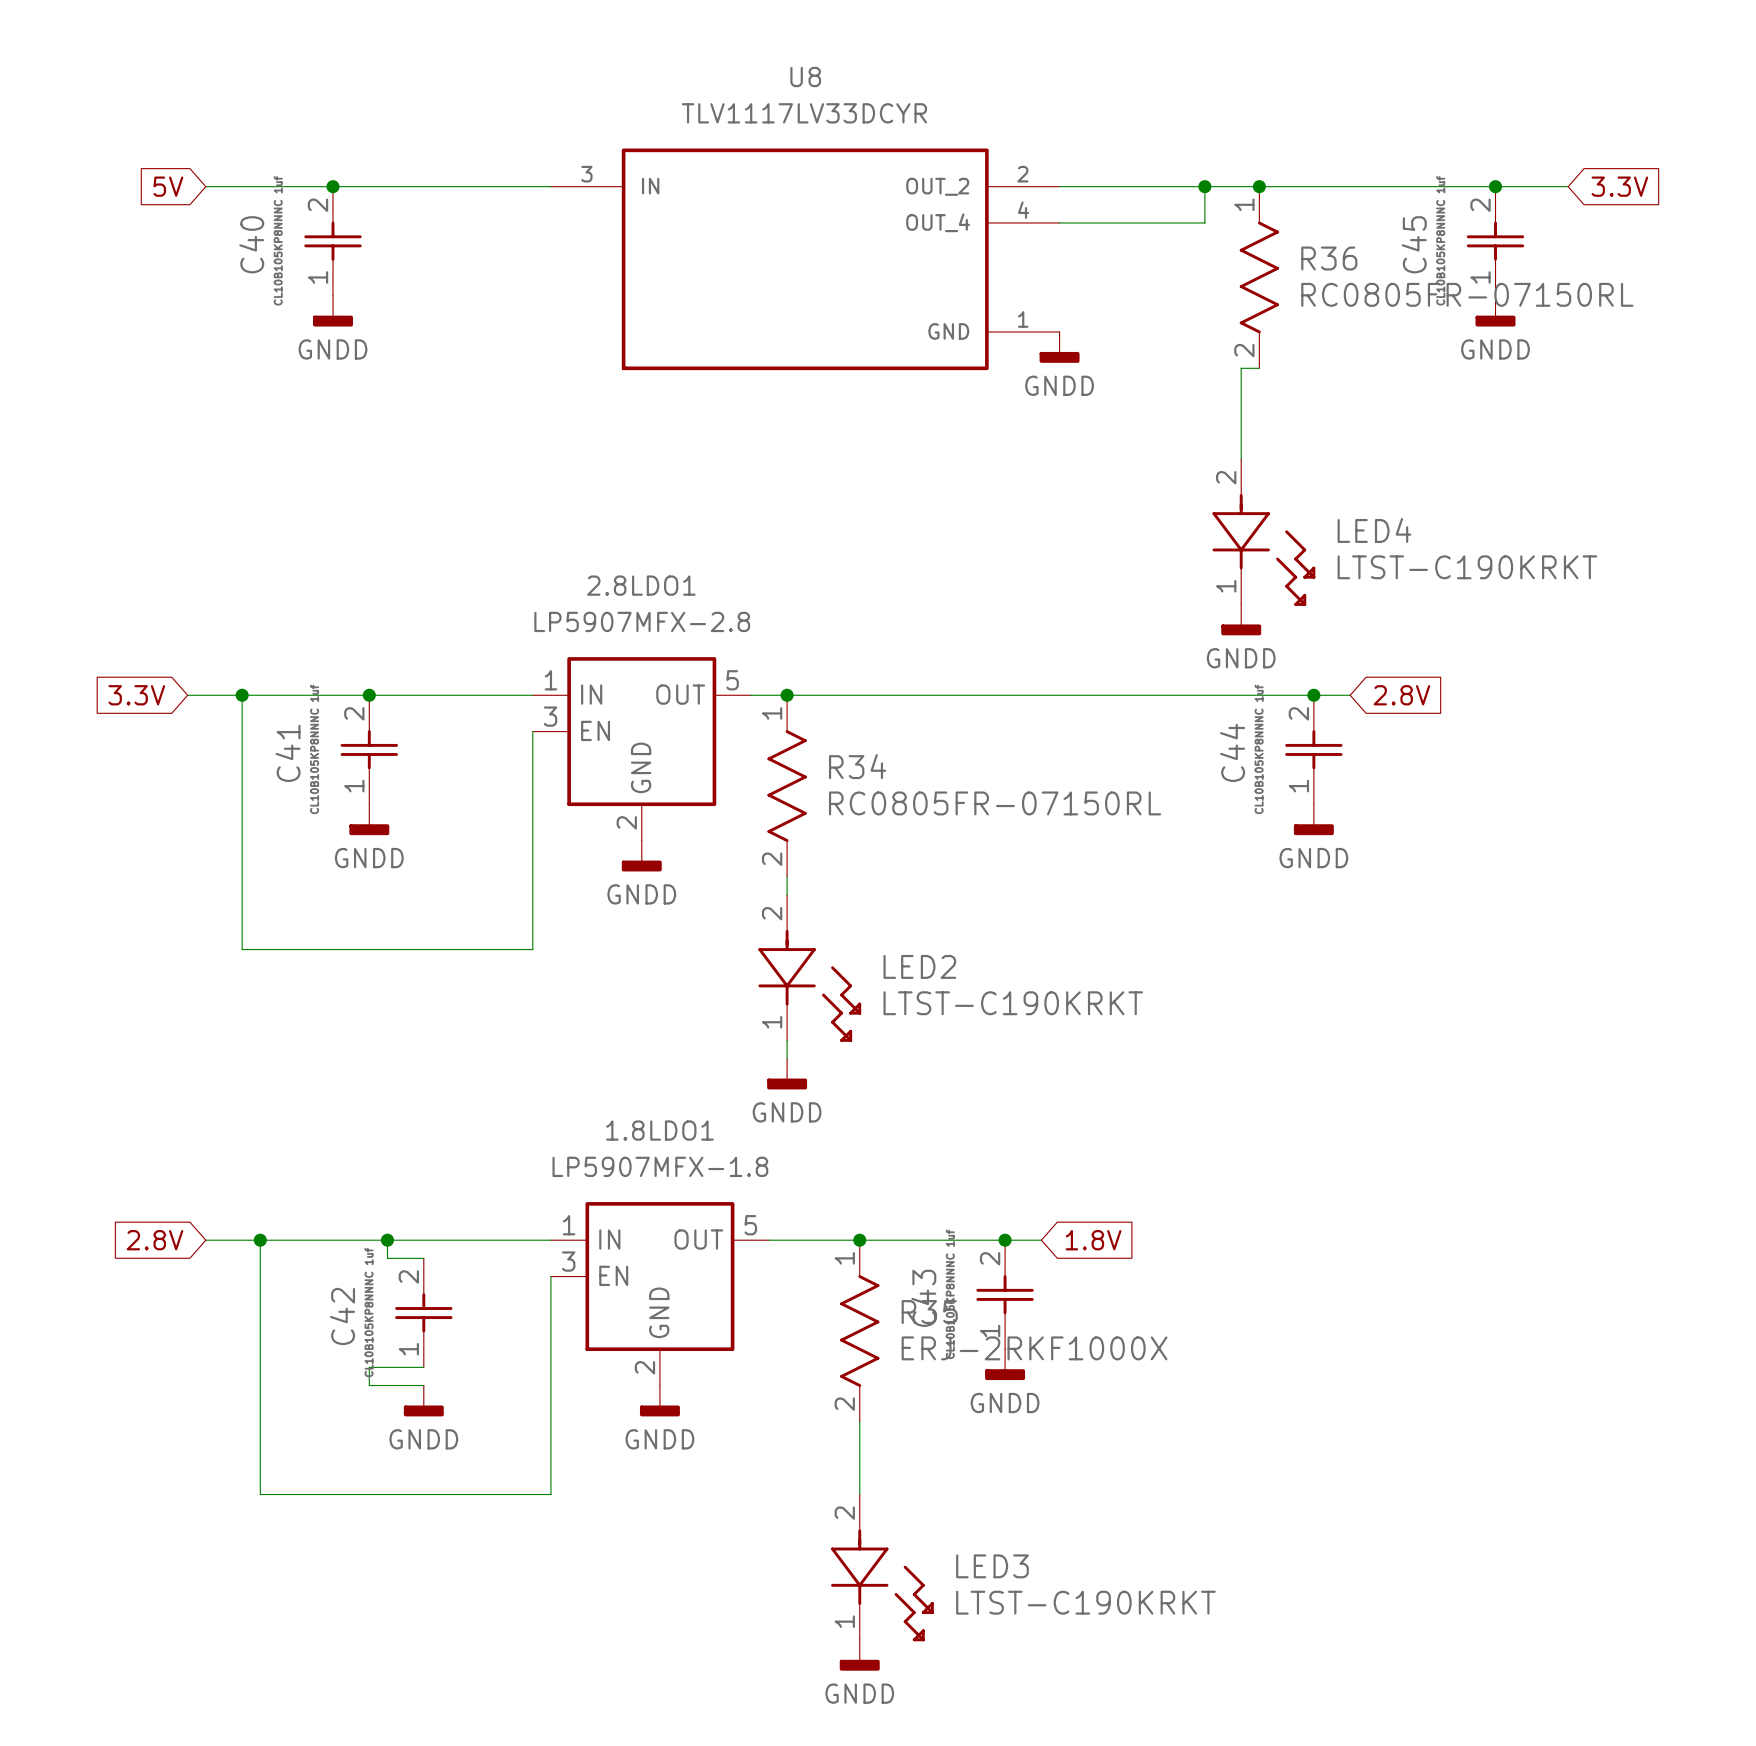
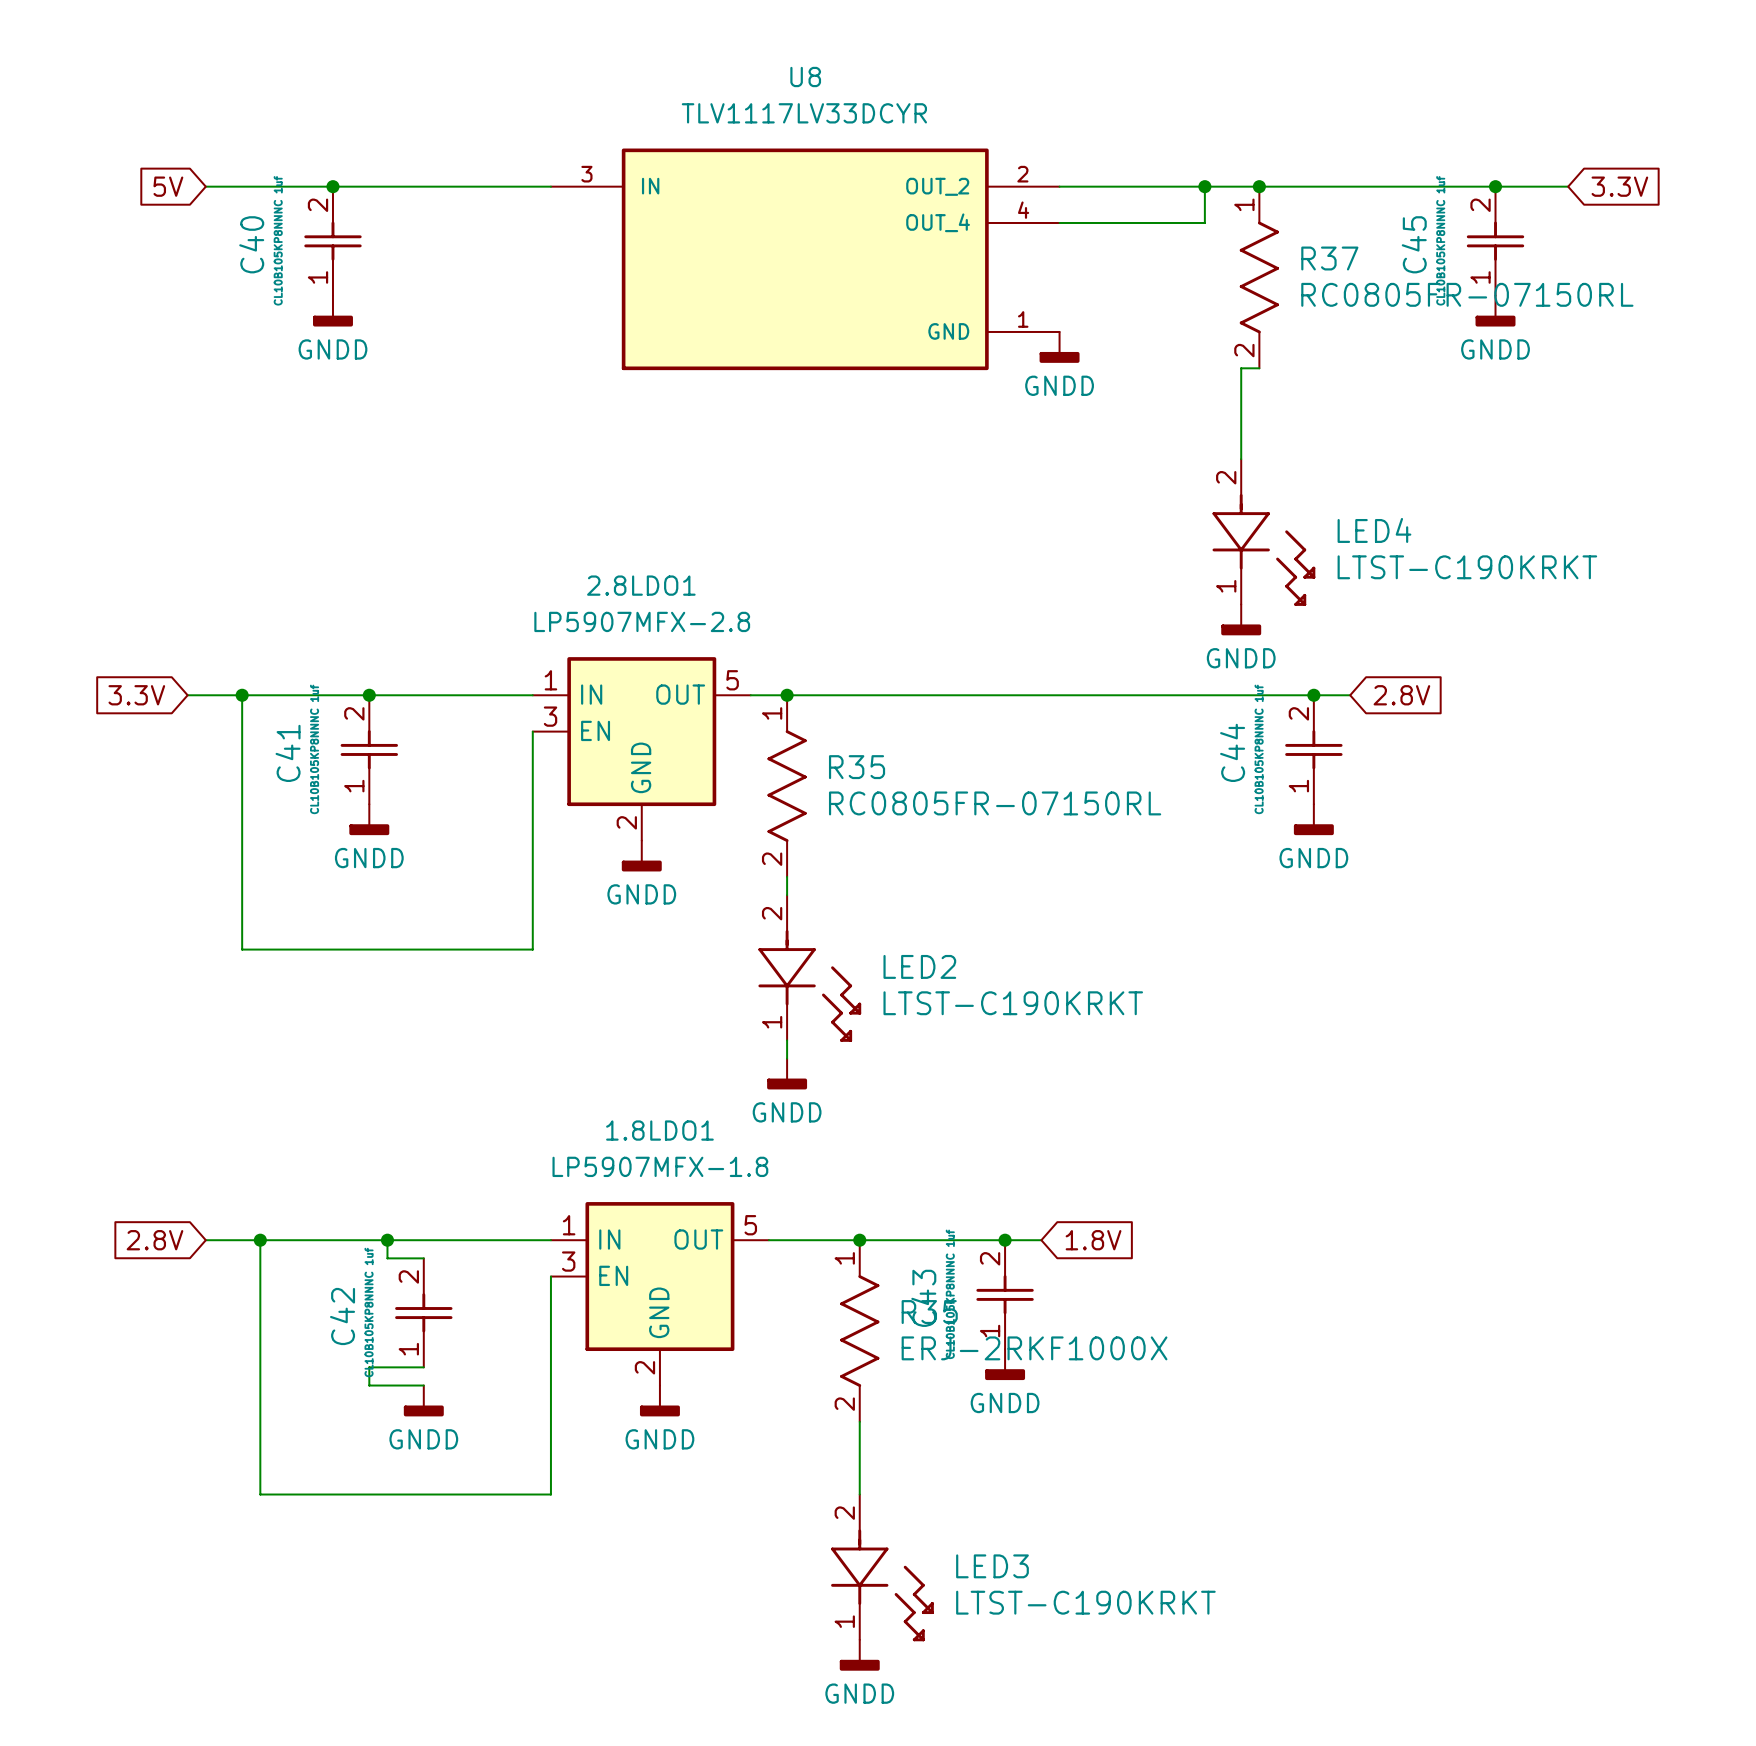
R36 name: R36 (1329, 258) -> R37 (1329, 258)
R34 name: R34 (857, 766) -> R35 (857, 767)

